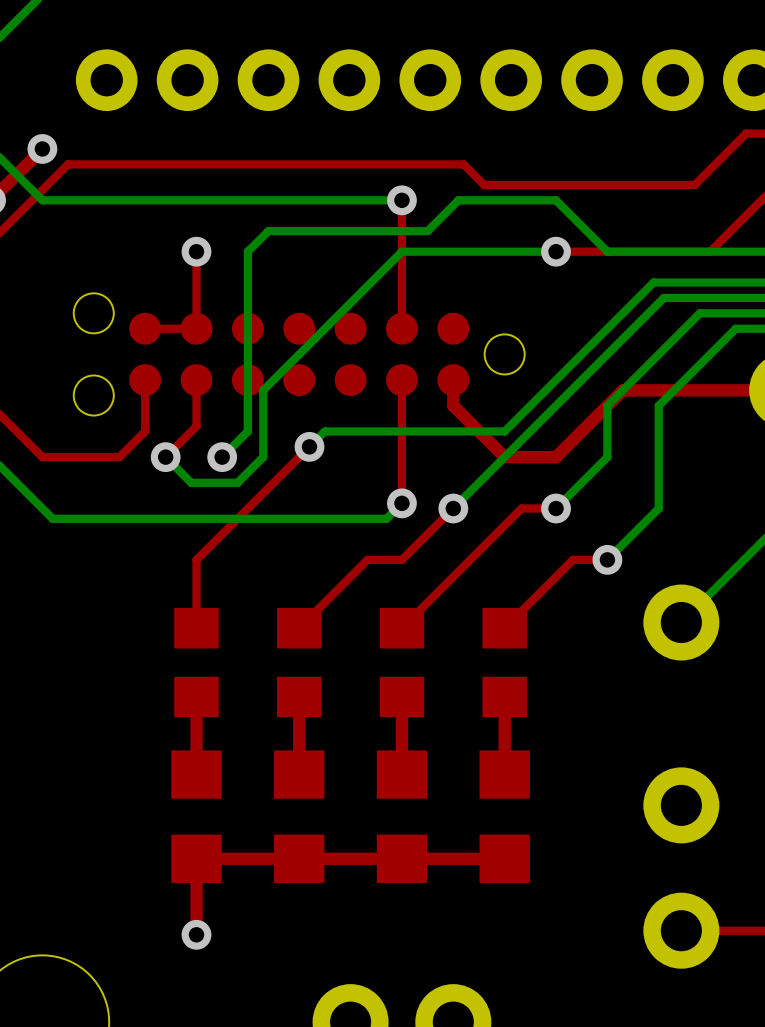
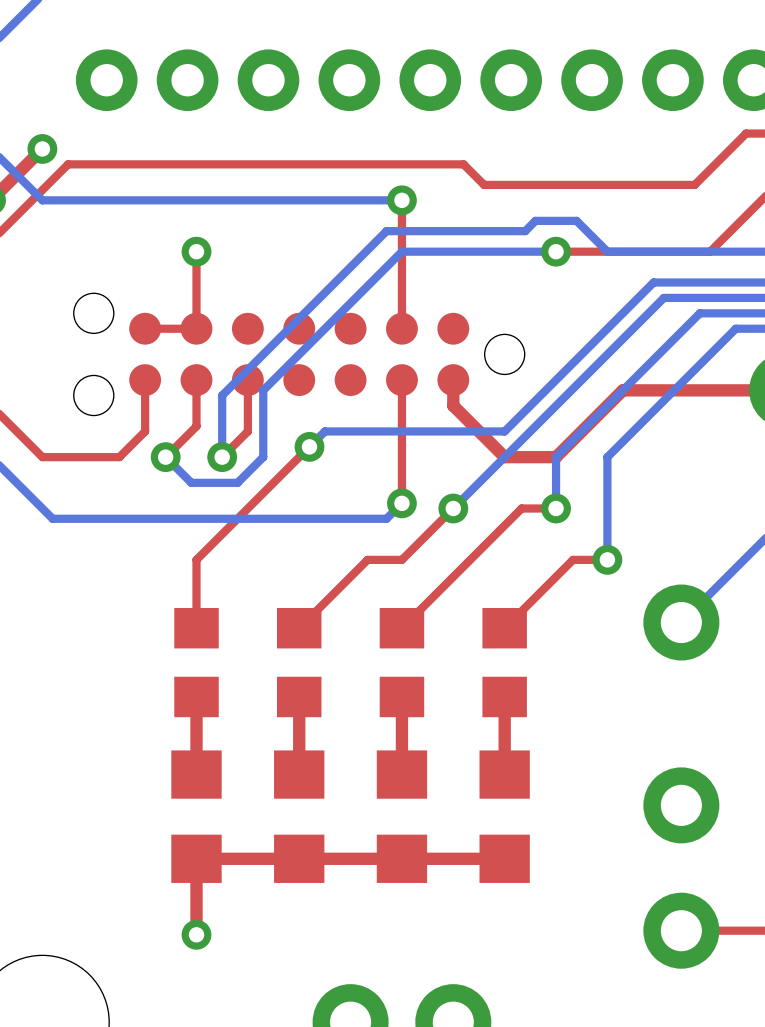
bottom track: (576, 220) (556, 200) (458, 200) (427, 231) -> (576, 220) (535, 220) (525, 231) (427, 231)
bottom track: (386, 231) (268, 231) (247, 251) (247, 431) (222, 457) -> (386, 231) (222, 395) (222, 457)
bottom track: (607, 405) (607, 457) (556, 508) -> (607, 405) (556, 457) (556, 508)
bottom track: (658, 405) (658, 508) (607, 559) -> (658, 405) (607, 457) (607, 559)

